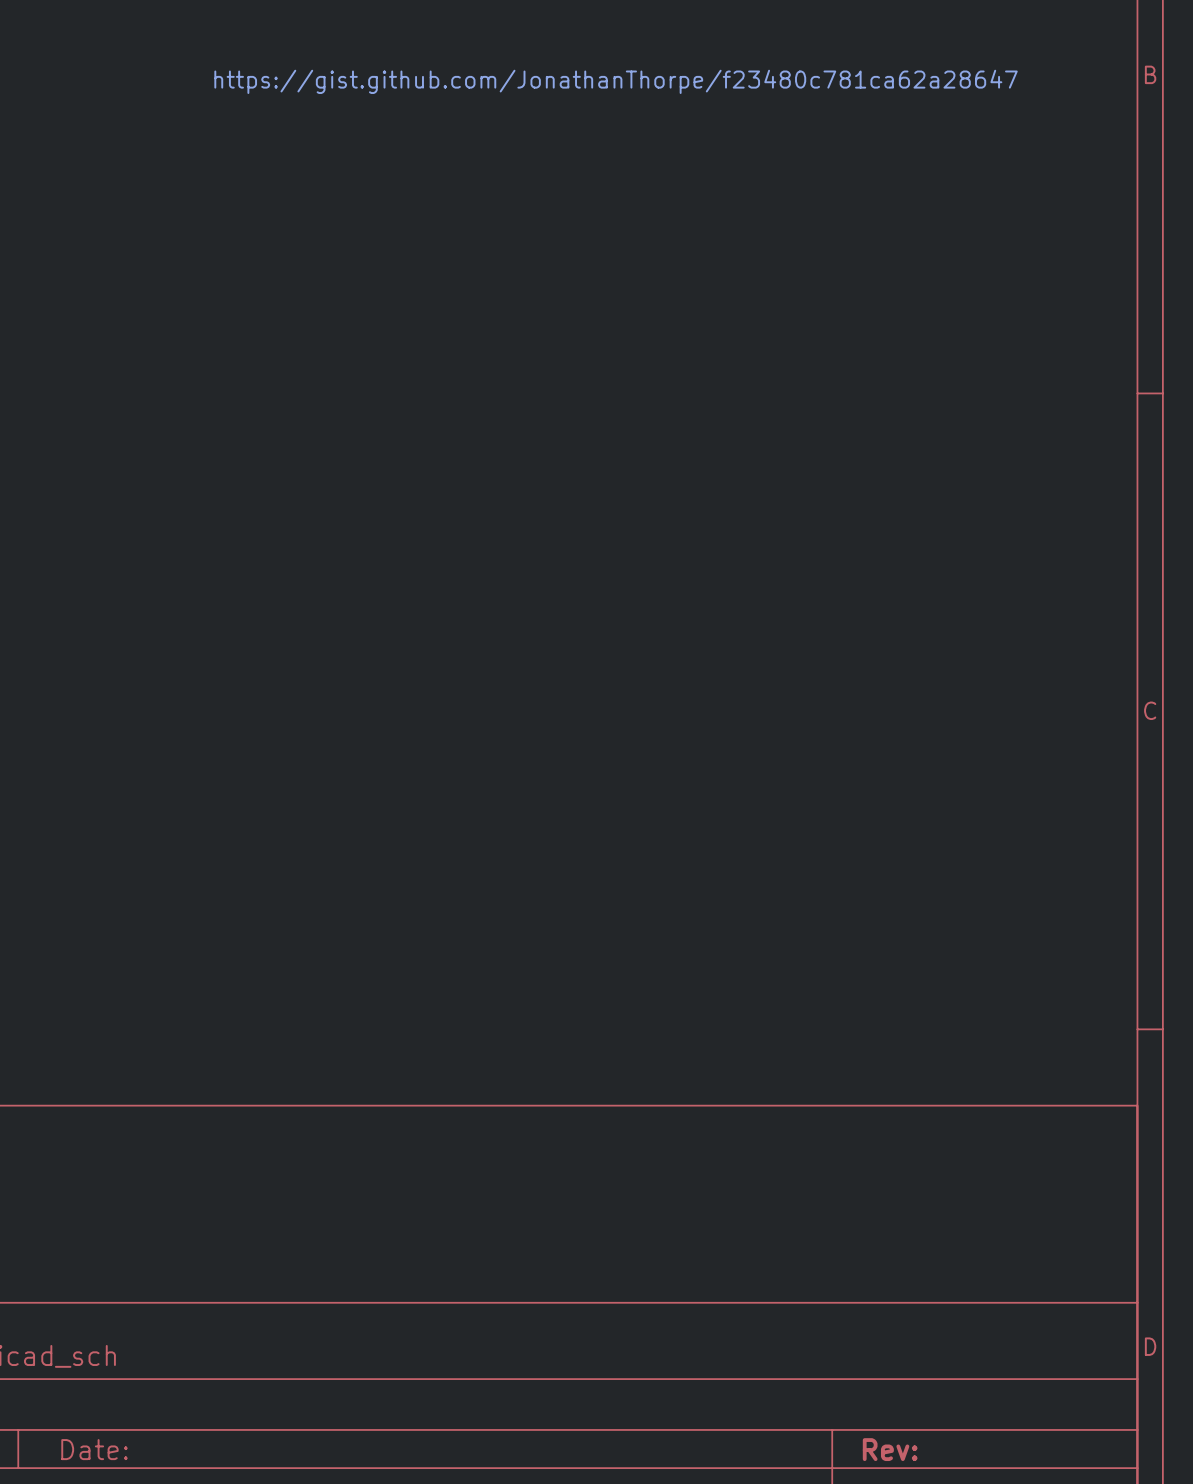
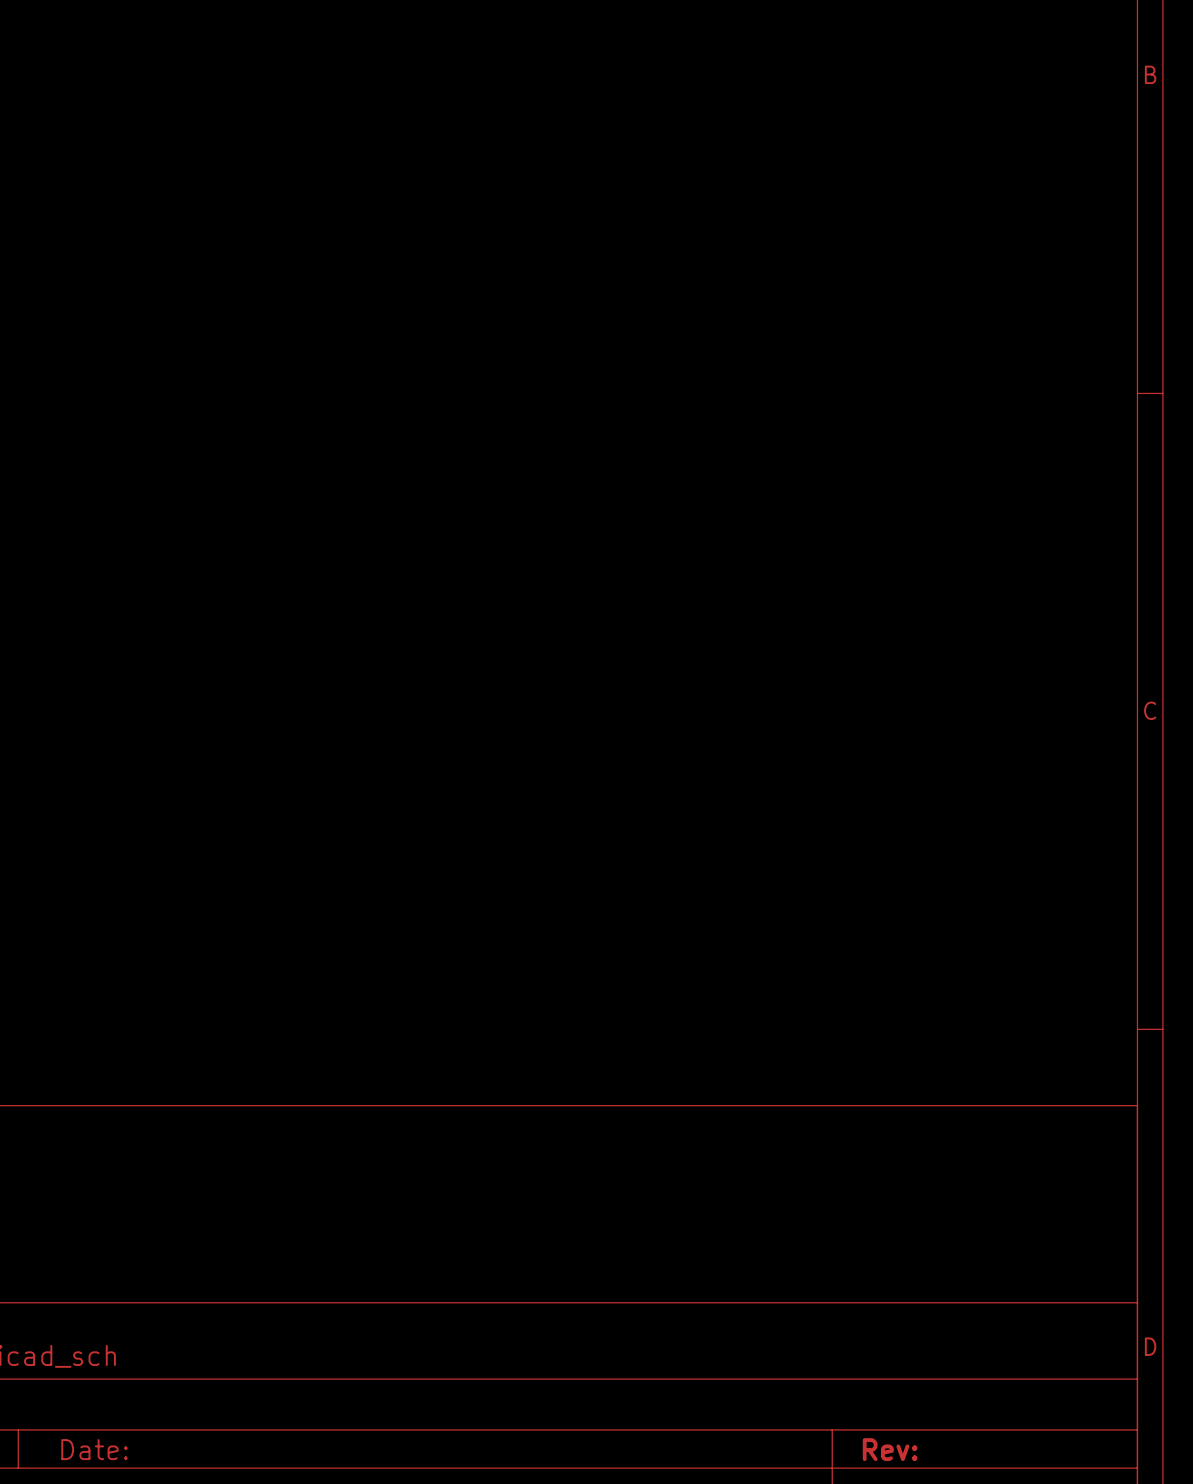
text: https://gist.github.com/JonathanThorpe/f23480c781ca62a28647 (616, 81) -> none

